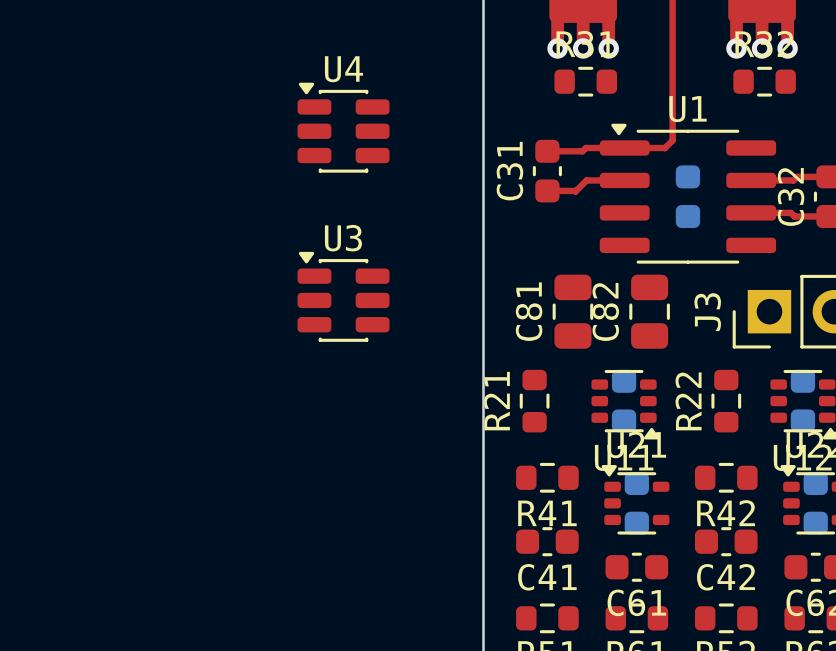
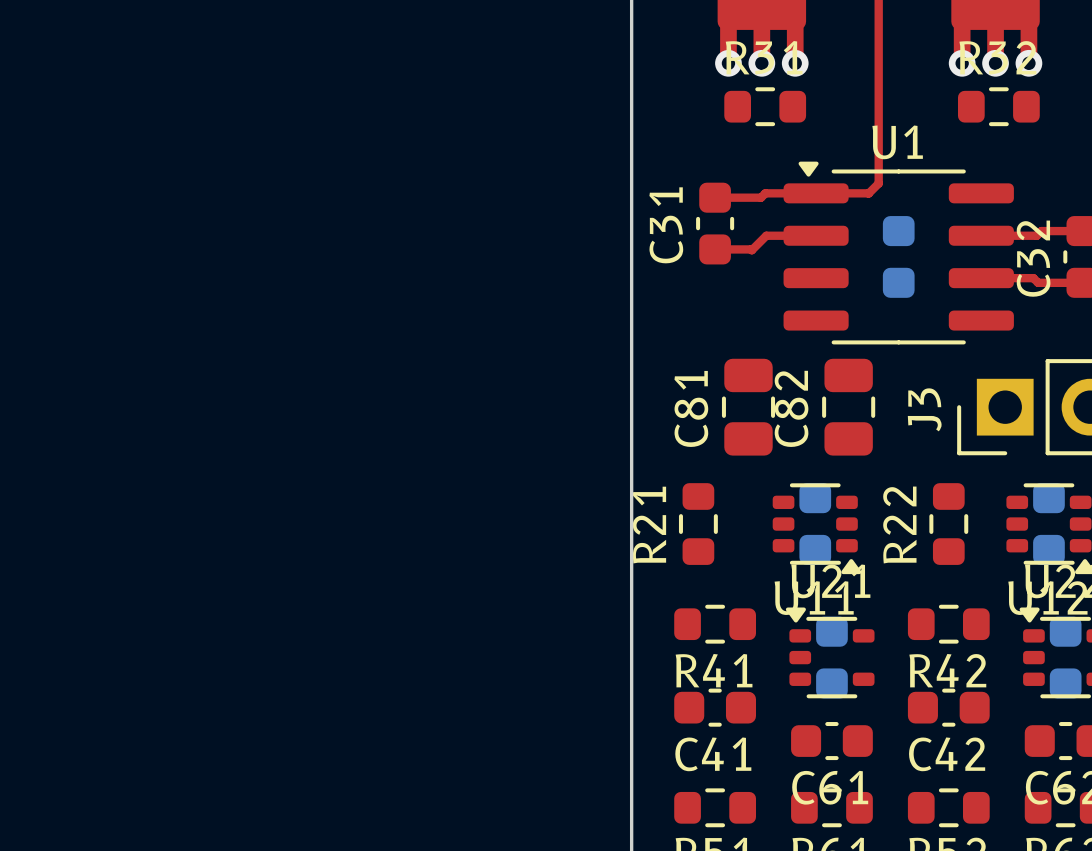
U4: (343, 127) -> none
U3: (343, 296) -> none

